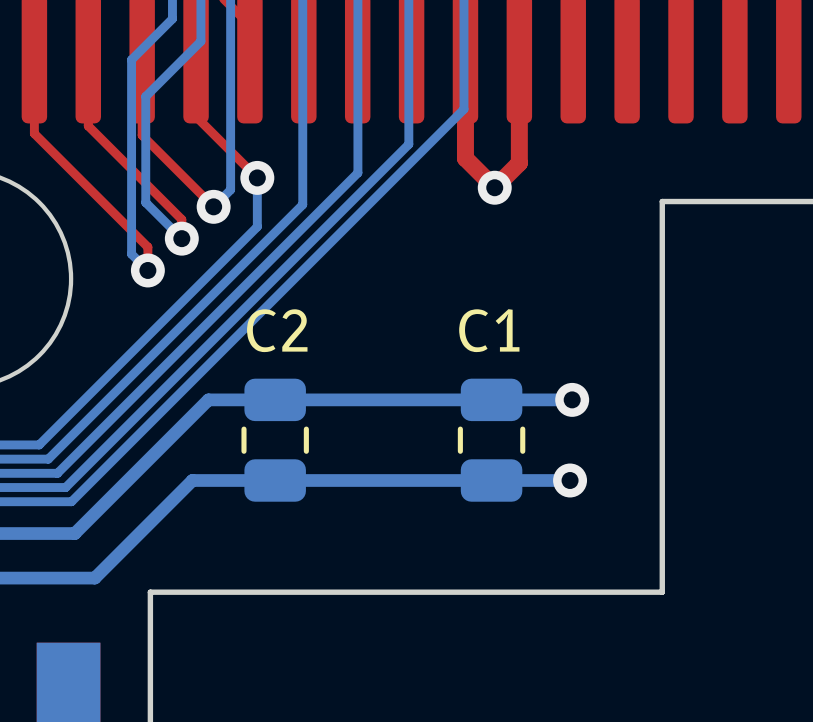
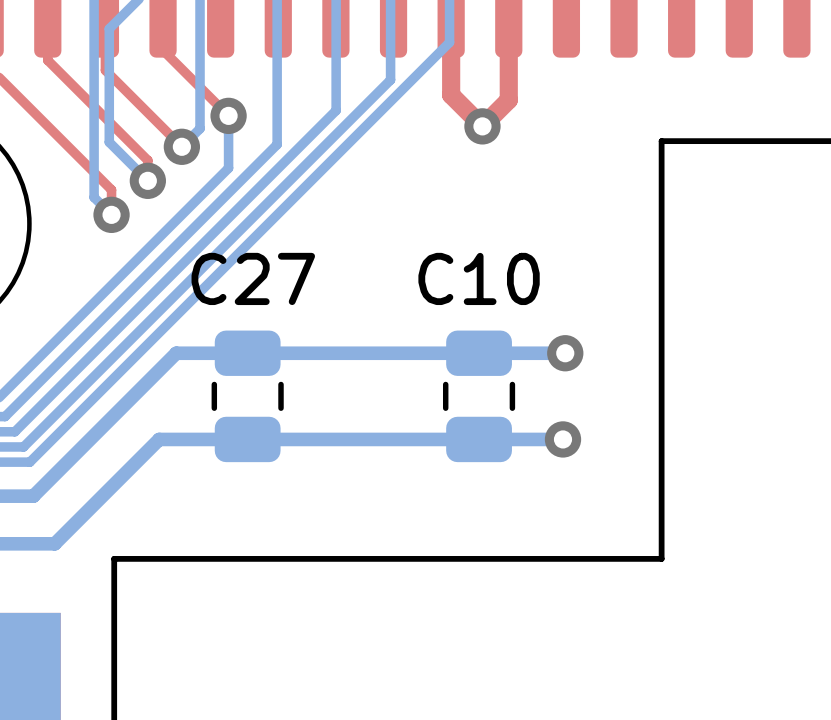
C2 name: C2 (277, 330) -> C27 (253, 278)
C1 name: C1 (489, 330) -> C10 (479, 278)

